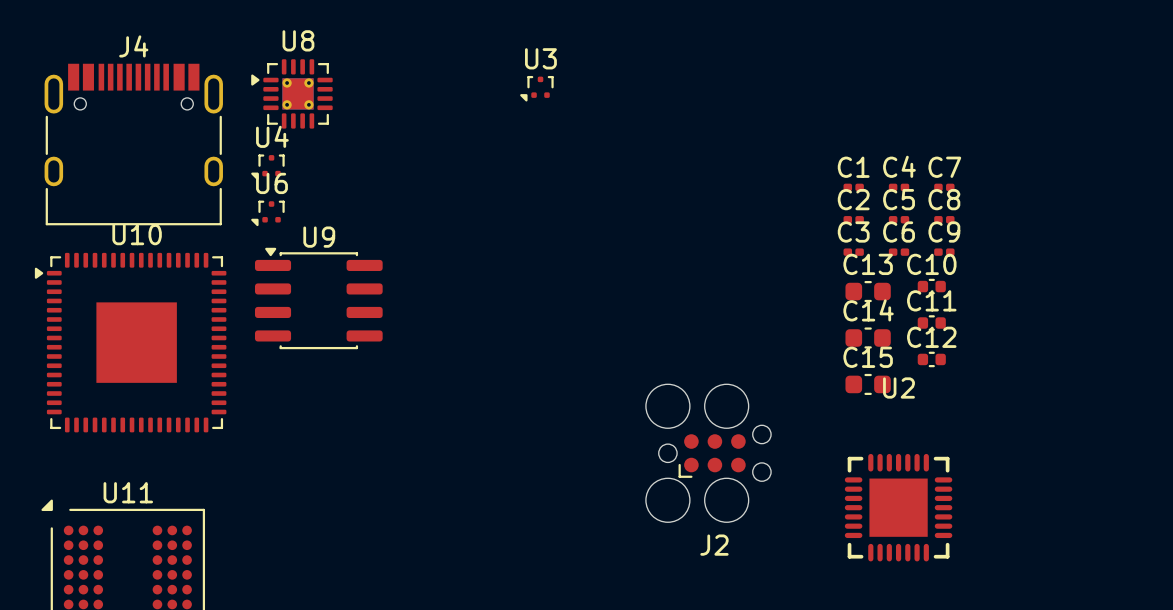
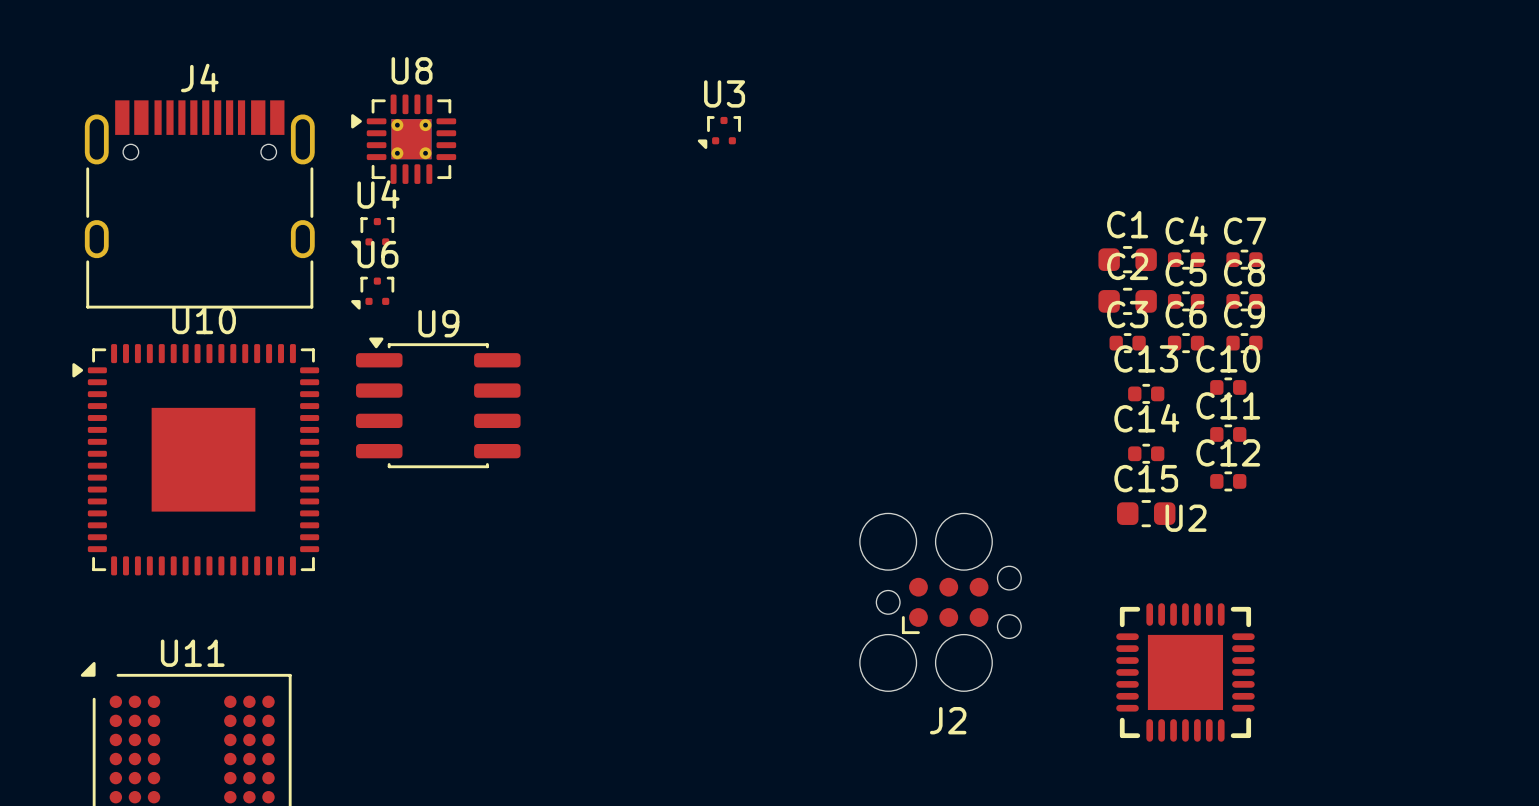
C1 footprint: [843, 183, 864, 192] -> [1098, 246, 1157, 274]
C4 footprint: [888, 183, 910, 192] -> [1167, 249, 1205, 270]
C7 footprint: [934, 183, 955, 192] -> [1226, 249, 1263, 270]
C2 footprint: [843, 216, 864, 224] -> [1098, 287, 1157, 315]
C5 footprint: [888, 216, 910, 224] -> [1167, 291, 1205, 312]
C8 footprint: [934, 216, 955, 224] -> [1226, 291, 1263, 312]
C3 footprint: [843, 248, 864, 256] -> [1109, 333, 1146, 354]
C6 footprint: [888, 248, 910, 256] -> [1167, 333, 1205, 354]
C9 footprint: [934, 248, 955, 256] -> [1226, 333, 1263, 354]
C13 footprint: [845, 281, 891, 303] -> [1128, 383, 1165, 404]
C14 footprint: [845, 327, 891, 349] -> [1128, 443, 1165, 464]

